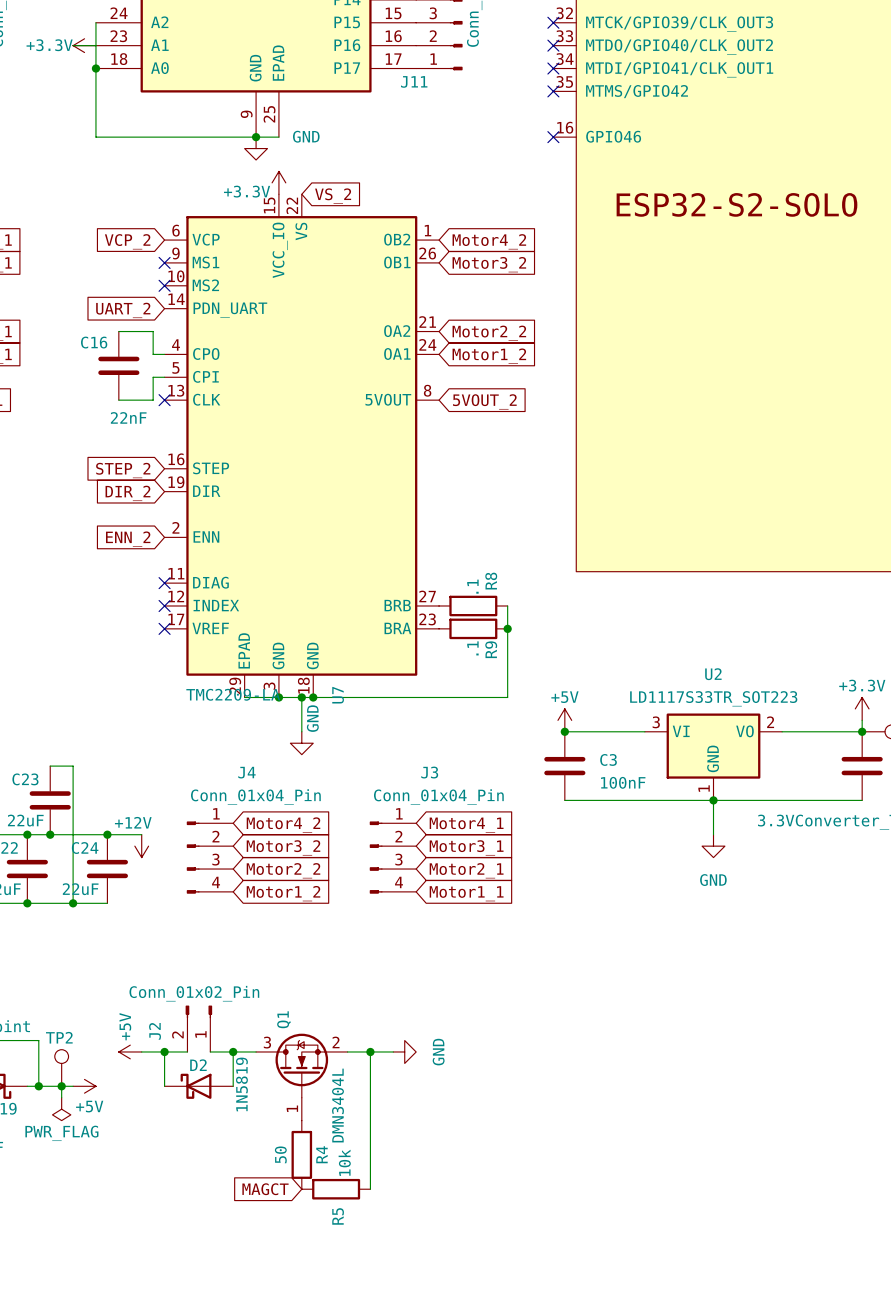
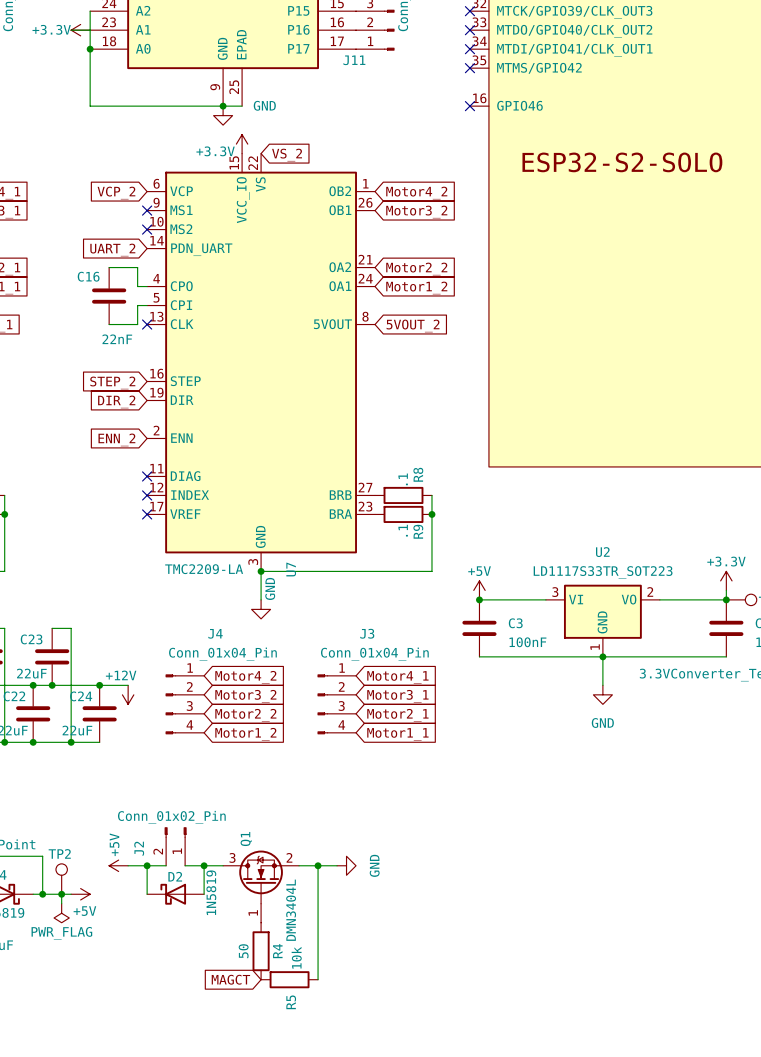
U7 symbol: [164, 194, 440, 698] -> [147, 153, 376, 572]
wire: (244, 697) (301, 697) -> none
junction: (278, 697) -> none
junction: (313, 697) -> none

